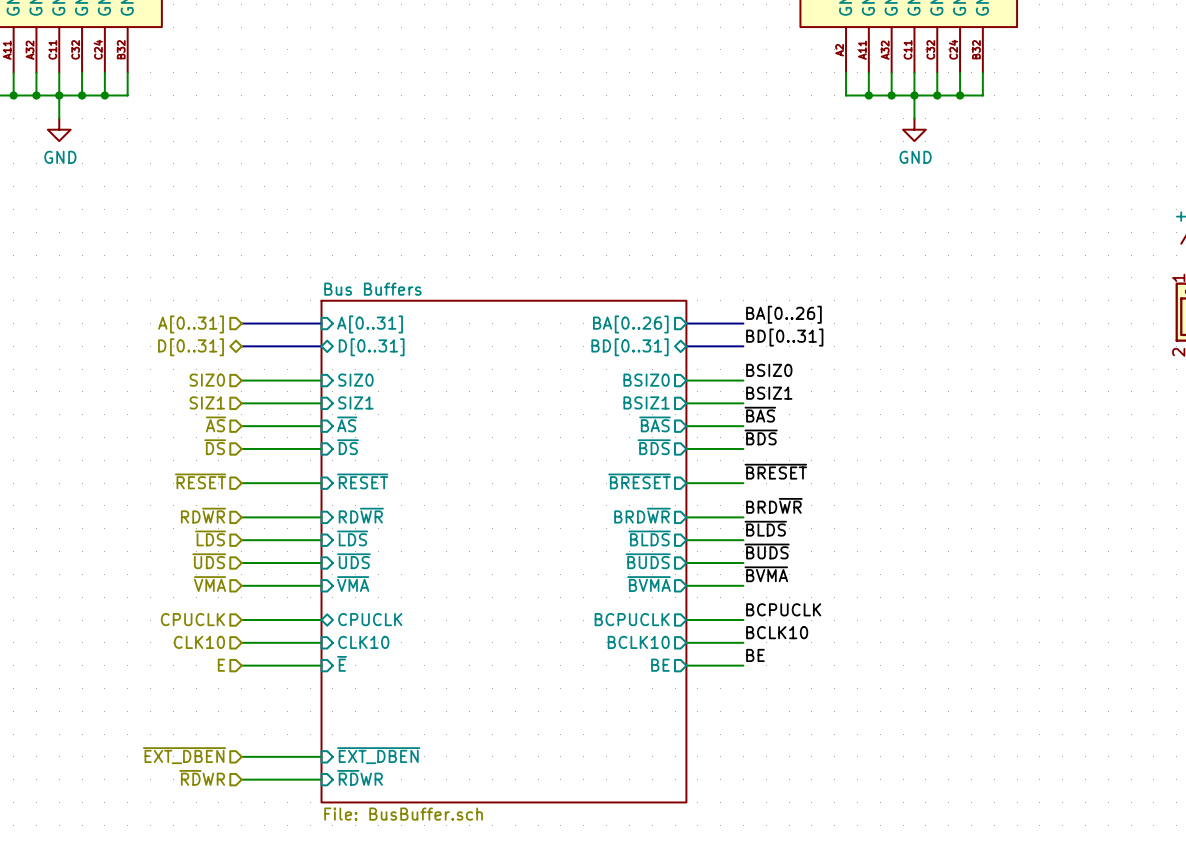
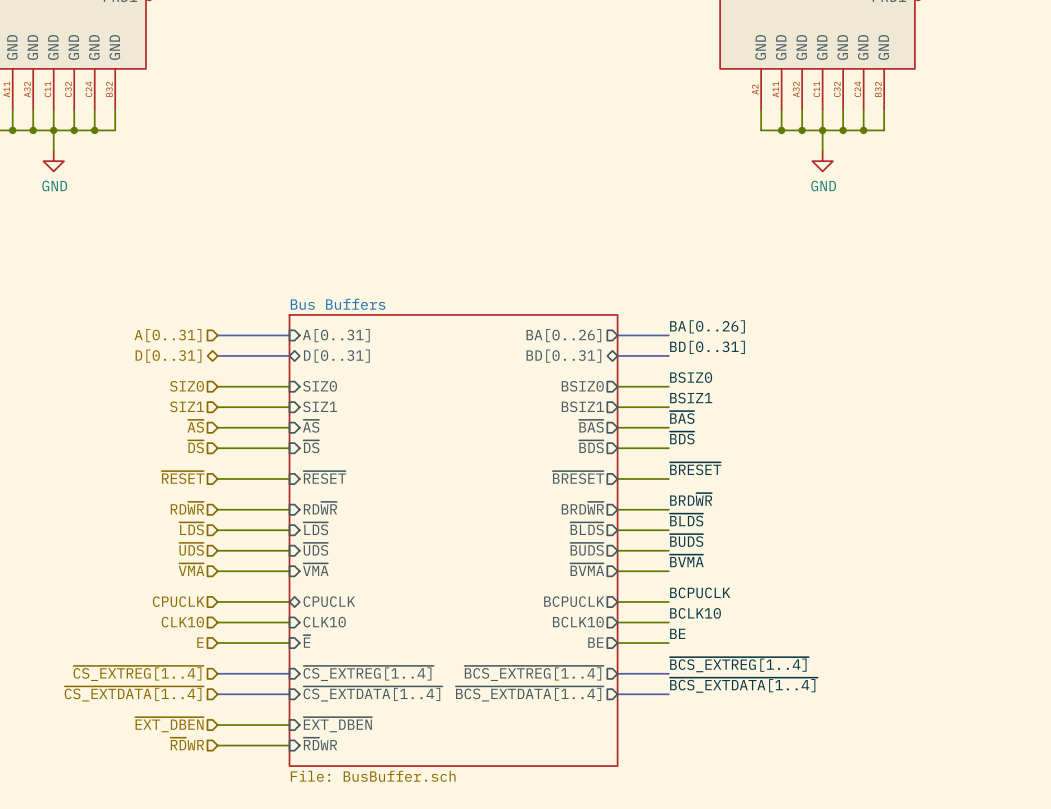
label: none -> ~{BCS_EXTREG[1..4]} (739, 664)
bus: none -> (217, 673) (289, 673)
bus: none -> (617, 673) (668, 673)
hierarchical label: none -> ~{CS_EXTREG[1..4]} (138, 673)
sheet pin: none -> ~{CS_EXTREG[1..4]} (368, 673)
sheet pin: none -> ~{BCS_EXTREG[1..4]} (534, 673)
label: none -> ~{BCS_EXTDATA[1..4]} (743, 685)
hierarchical label: none -> ~{CS_EXTDATA[1..4]} (134, 693)
bus: none -> (217, 694) (289, 694)
sheet pin: none -> ~{CS_EXTDATA[1..4]} (373, 693)
sheet pin: none -> ~{BCS_EXTDATA[1..4]} (529, 693)
bus: none -> (617, 694) (668, 694)

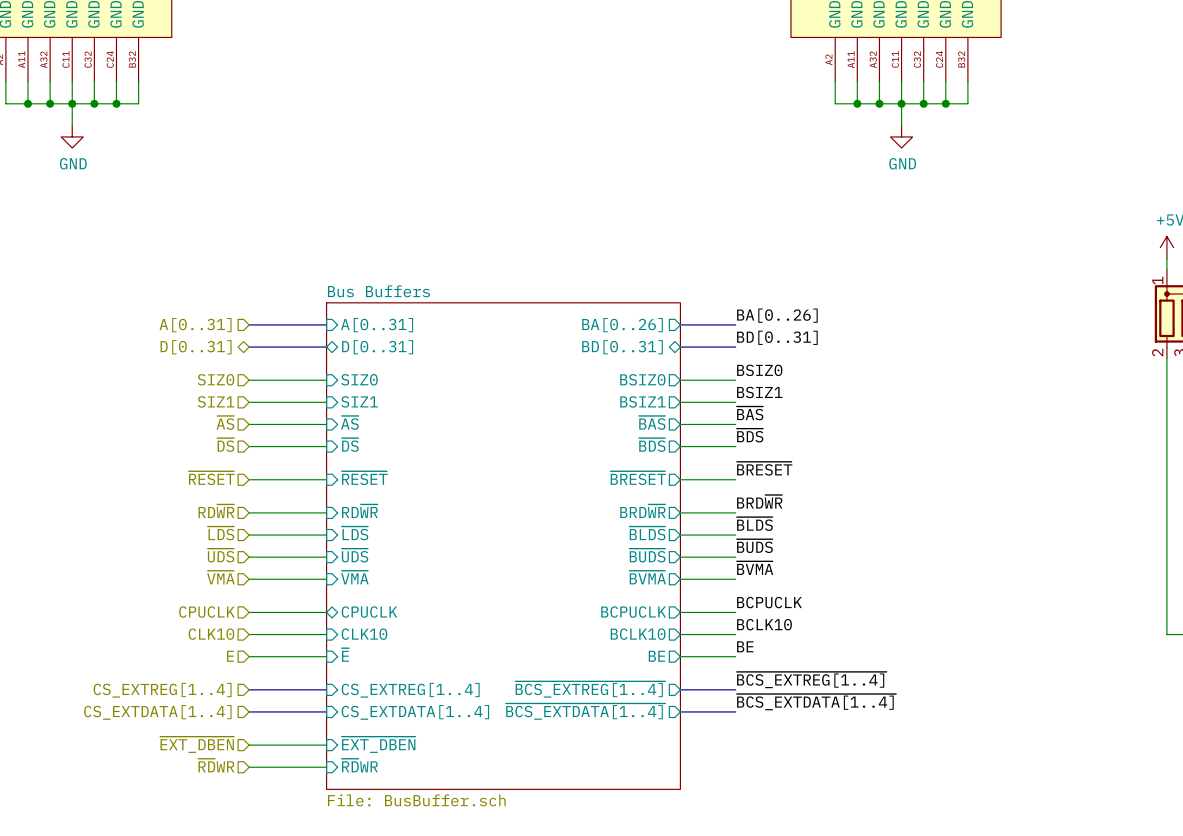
hierarchical label: ~{CS_EXTREG[1..4]} (138, 673) -> CS_EXTREG[1..4] (162, 690)
sheet pin: ~{CS_EXTREG[1..4]} (368, 673) -> CS_EXTREG[1..4] (410, 690)
hierarchical label: ~{CS_EXTDATA[1..4]} (134, 693) -> CS_EXTDATA[1..4] (157, 712)
sheet pin: ~{CS_EXTDATA[1..4]} (373, 693) -> CS_EXTDATA[1..4] (415, 712)

